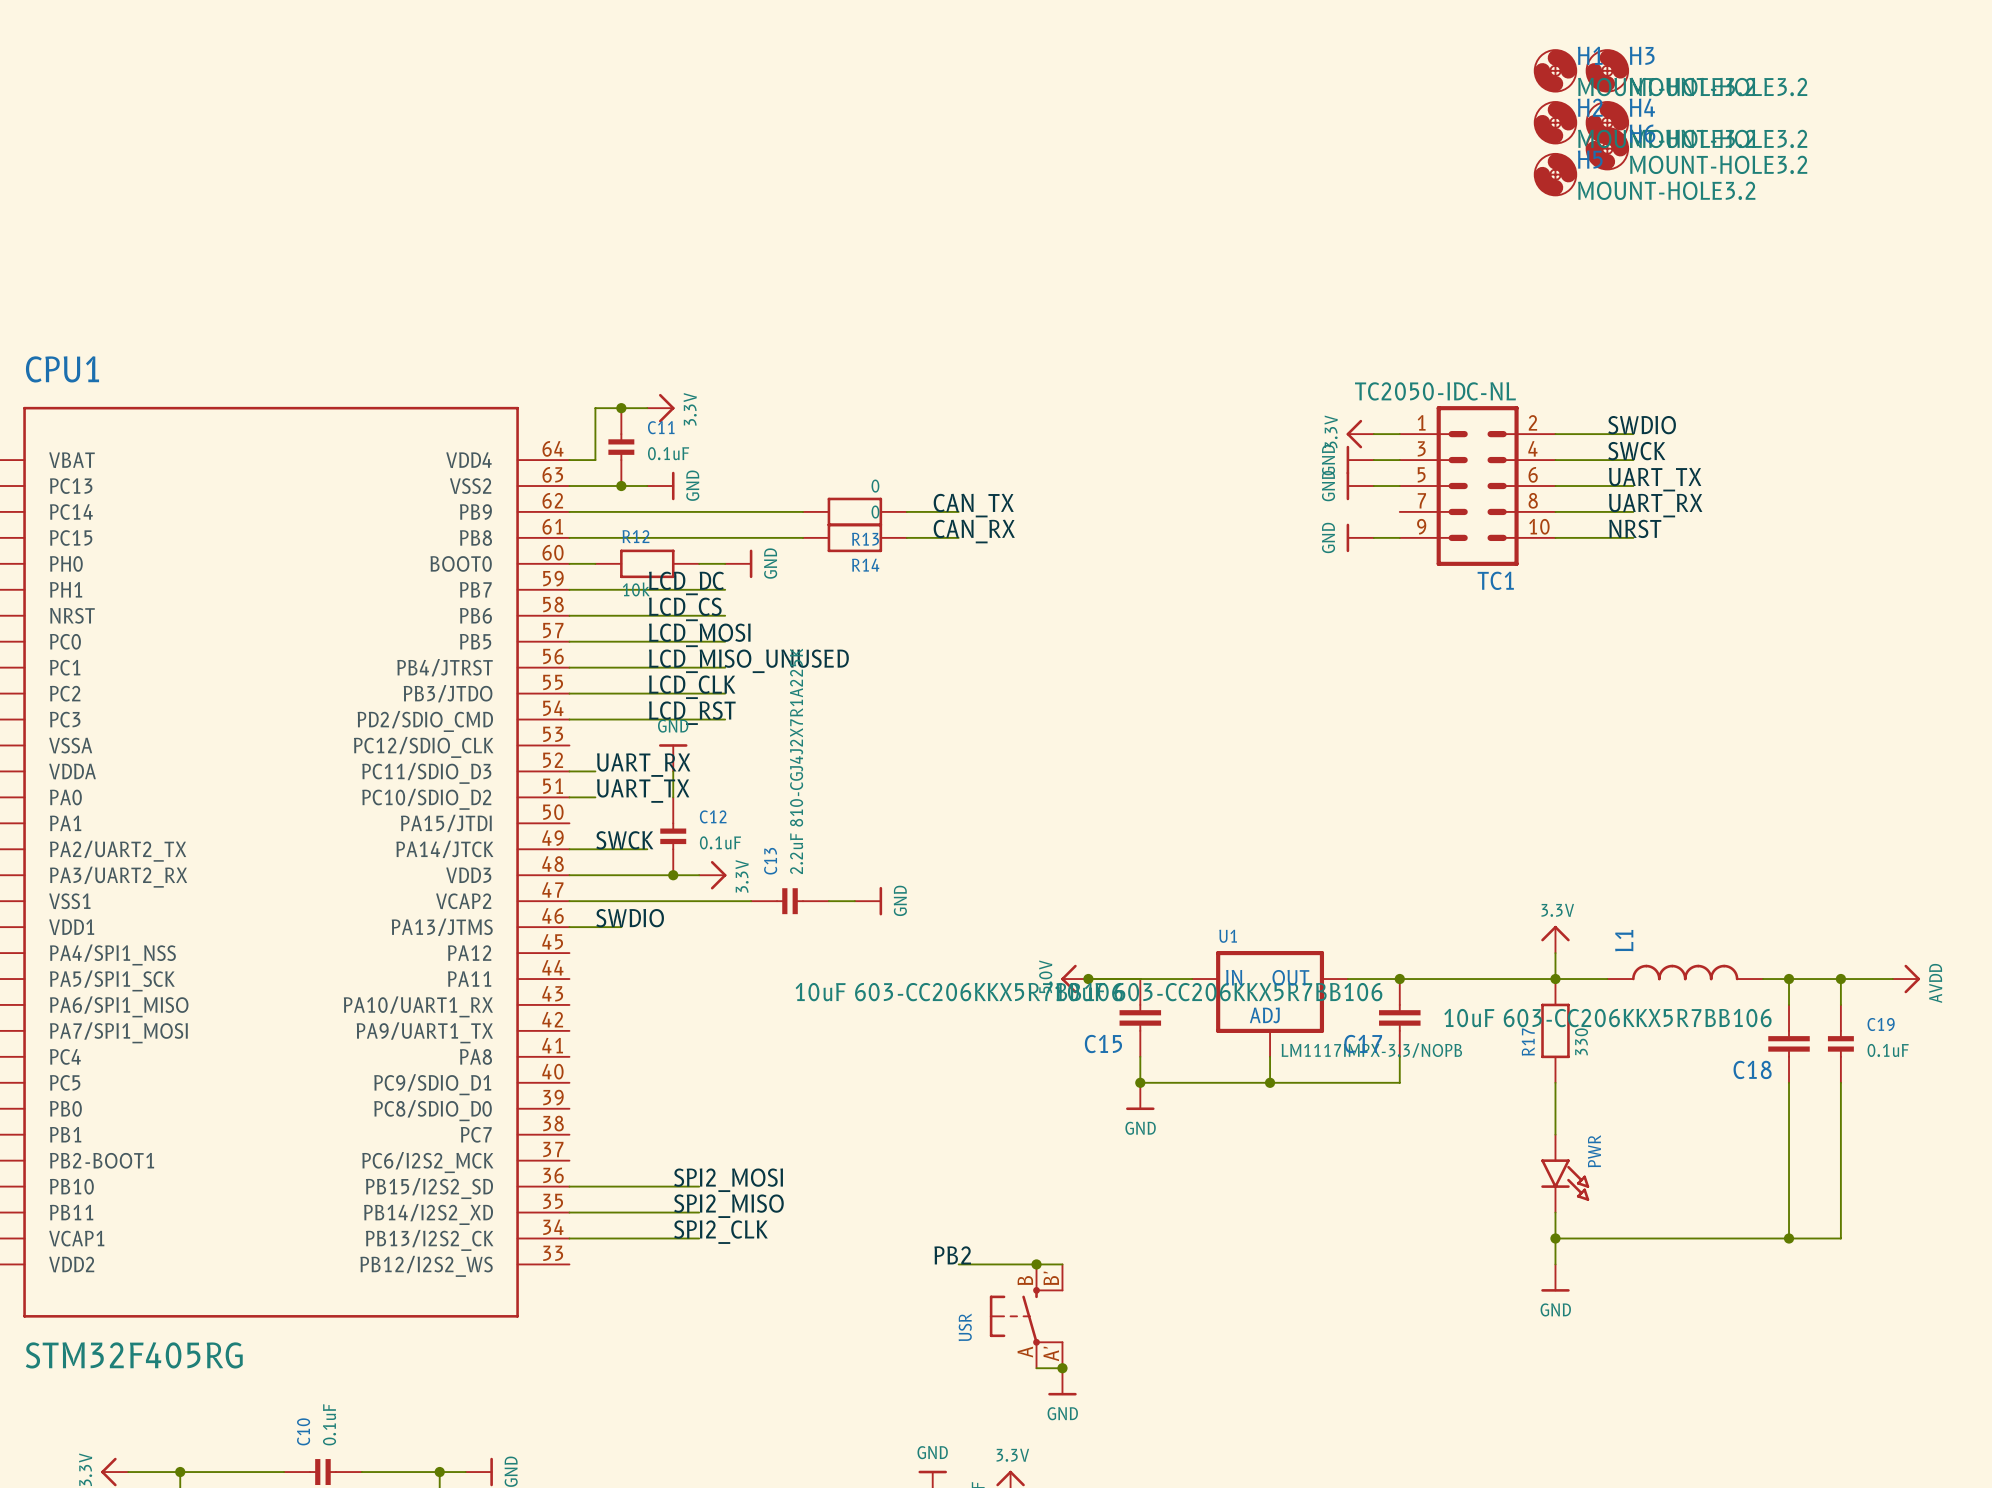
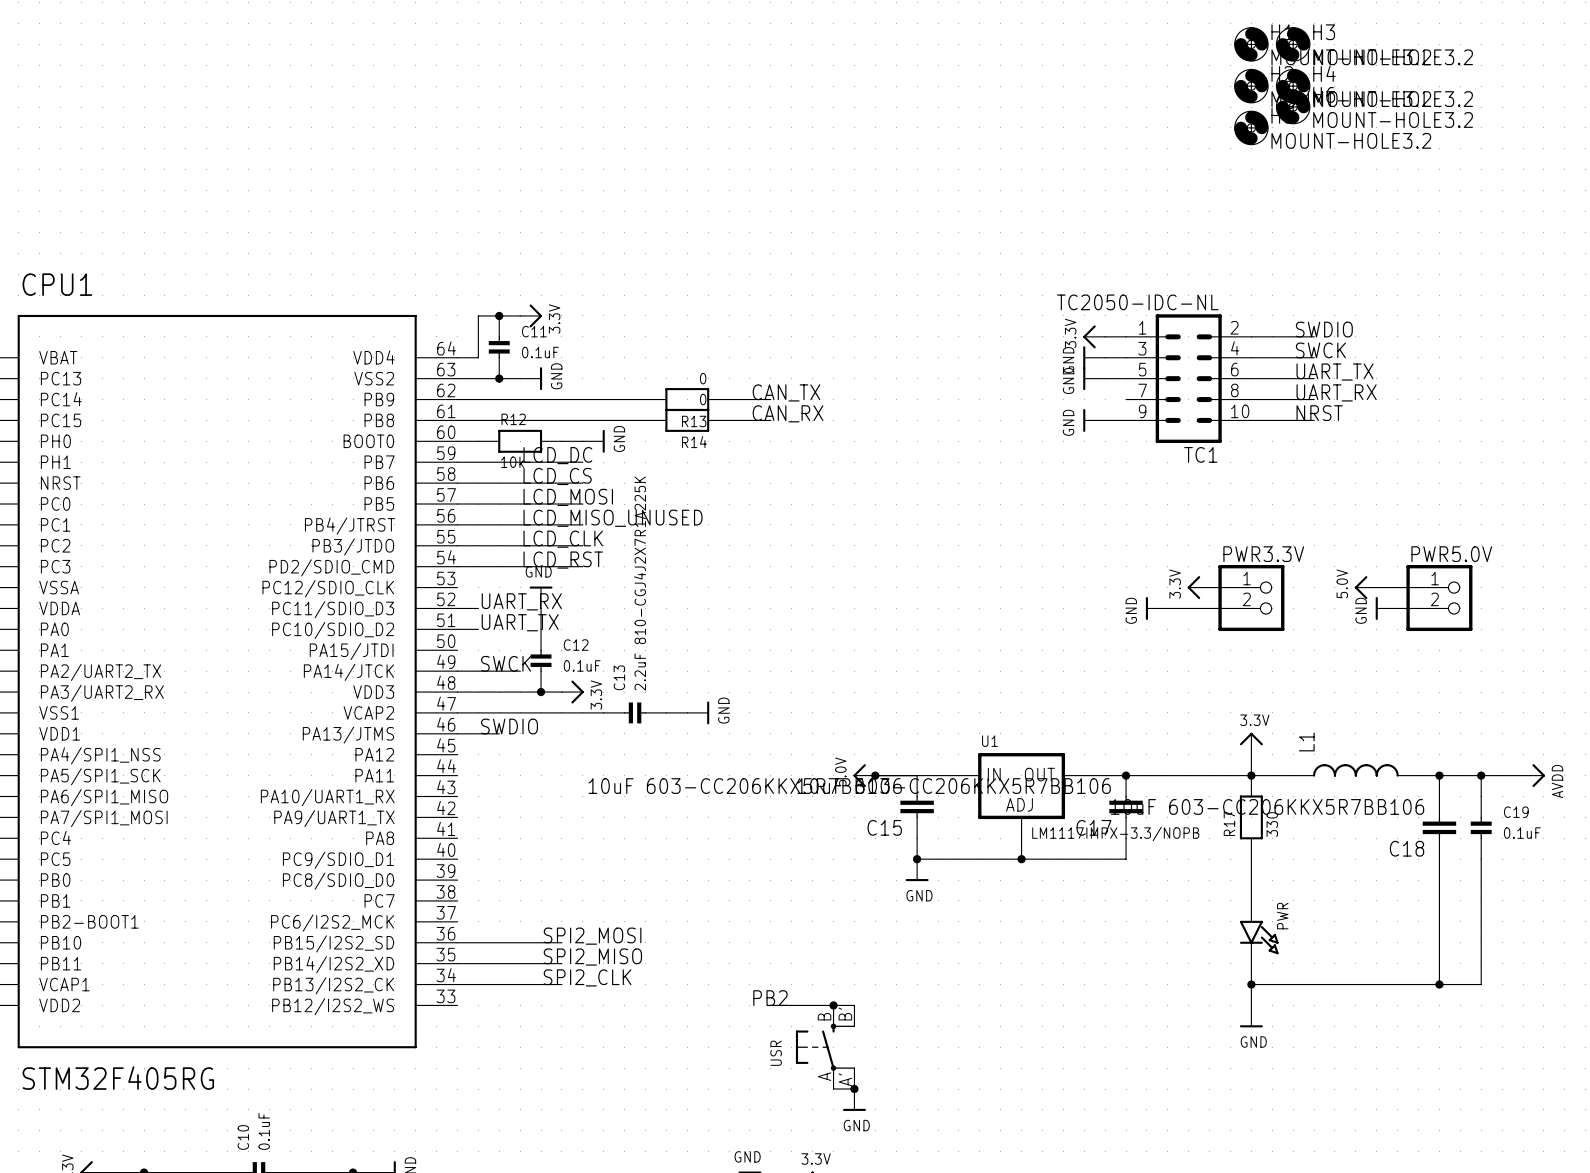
power symbol: none -> 3.3V (1198, 587)
wire: none -> (1209, 587) (1251, 587)
power symbol: none -> 5.0V (1365, 587)
wire: none -> (1376, 587) (1439, 587)
PWR3.3V: none -> (1251, 598)
PWR5.0V: none -> (1439, 598)
power symbol: none -> GND (1156, 608)
wire: none -> (1167, 608) (1251, 608)
power symbol: none -> GND (1386, 608)
wire: none -> (1397, 608) (1439, 608)

